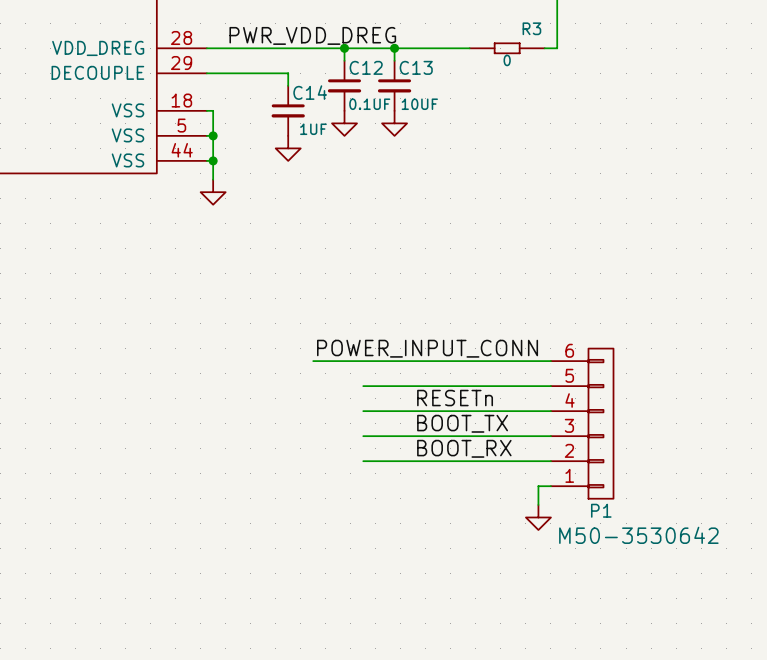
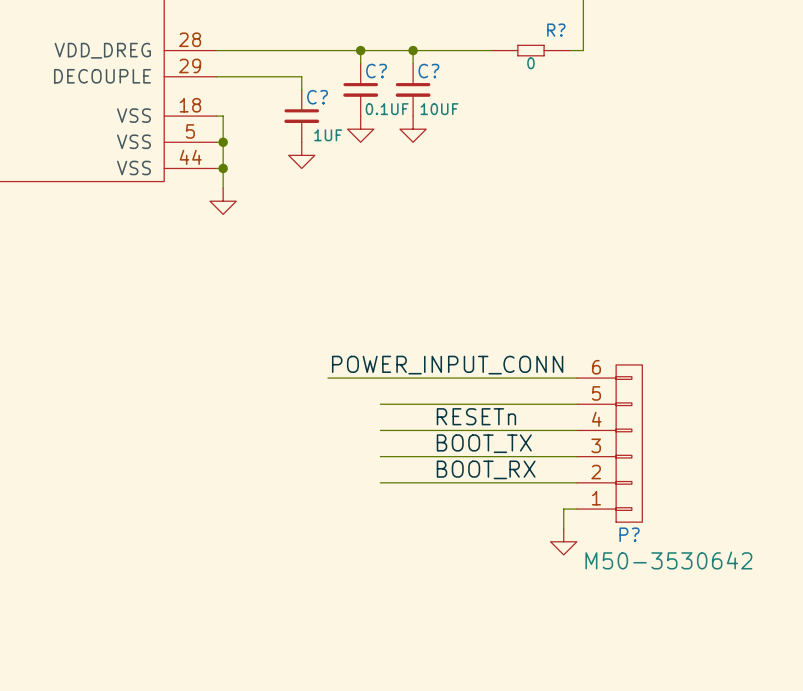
R3 name: R3 (531, 28) -> R? (556, 30)
label: PWR_VDD_DREG (312, 35) -> none
C12 name: C12 (366, 67) -> C? (376, 71)
C13 name: C13 (416, 67) -> C? (428, 71)
C14 name: C14 (310, 92) -> C? (317, 97)
P1 name: P1 (601, 510) -> P? (629, 534)

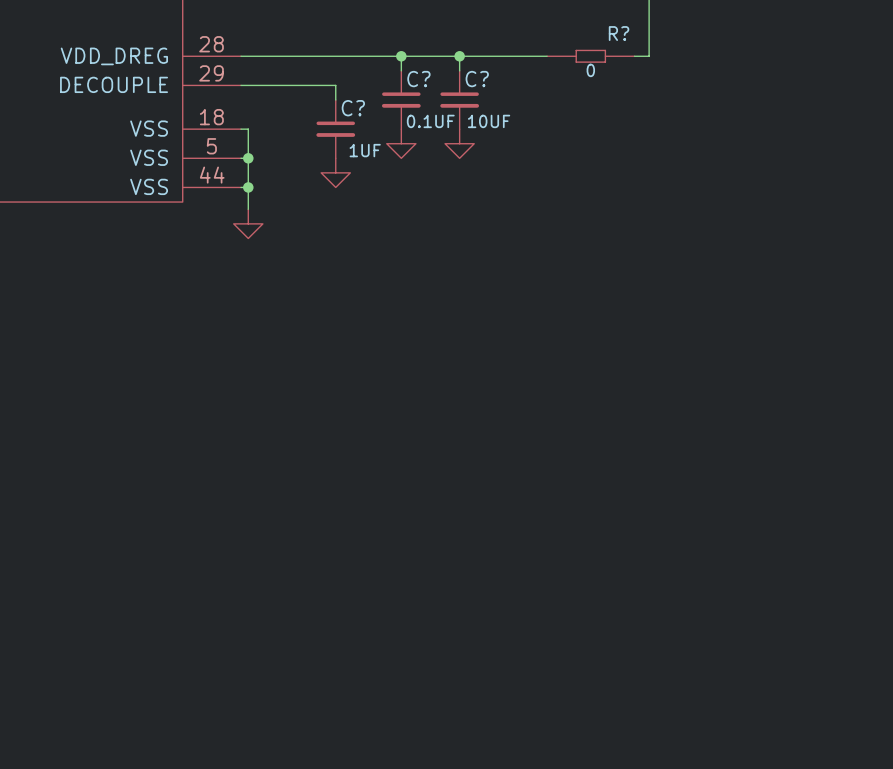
label: POWER_INPUT_CONN (447, 365) -> none
wire: (327, 378) (576, 378) -> none
wire: (380, 404) (576, 404) -> none
label: RESETn (476, 416) -> none
wire: (380, 430) (576, 430) -> none
label: BOOT_TX (484, 443) -> none
P?: (609, 443) -> none
wire: (380, 456) (576, 456) -> none
label: BOOT_RX (486, 469) -> none
wire: (380, 482) (576, 482) -> none
wire: (576, 509) (563, 509) (563, 528) -> none
power symbol: (563, 541) -> none

